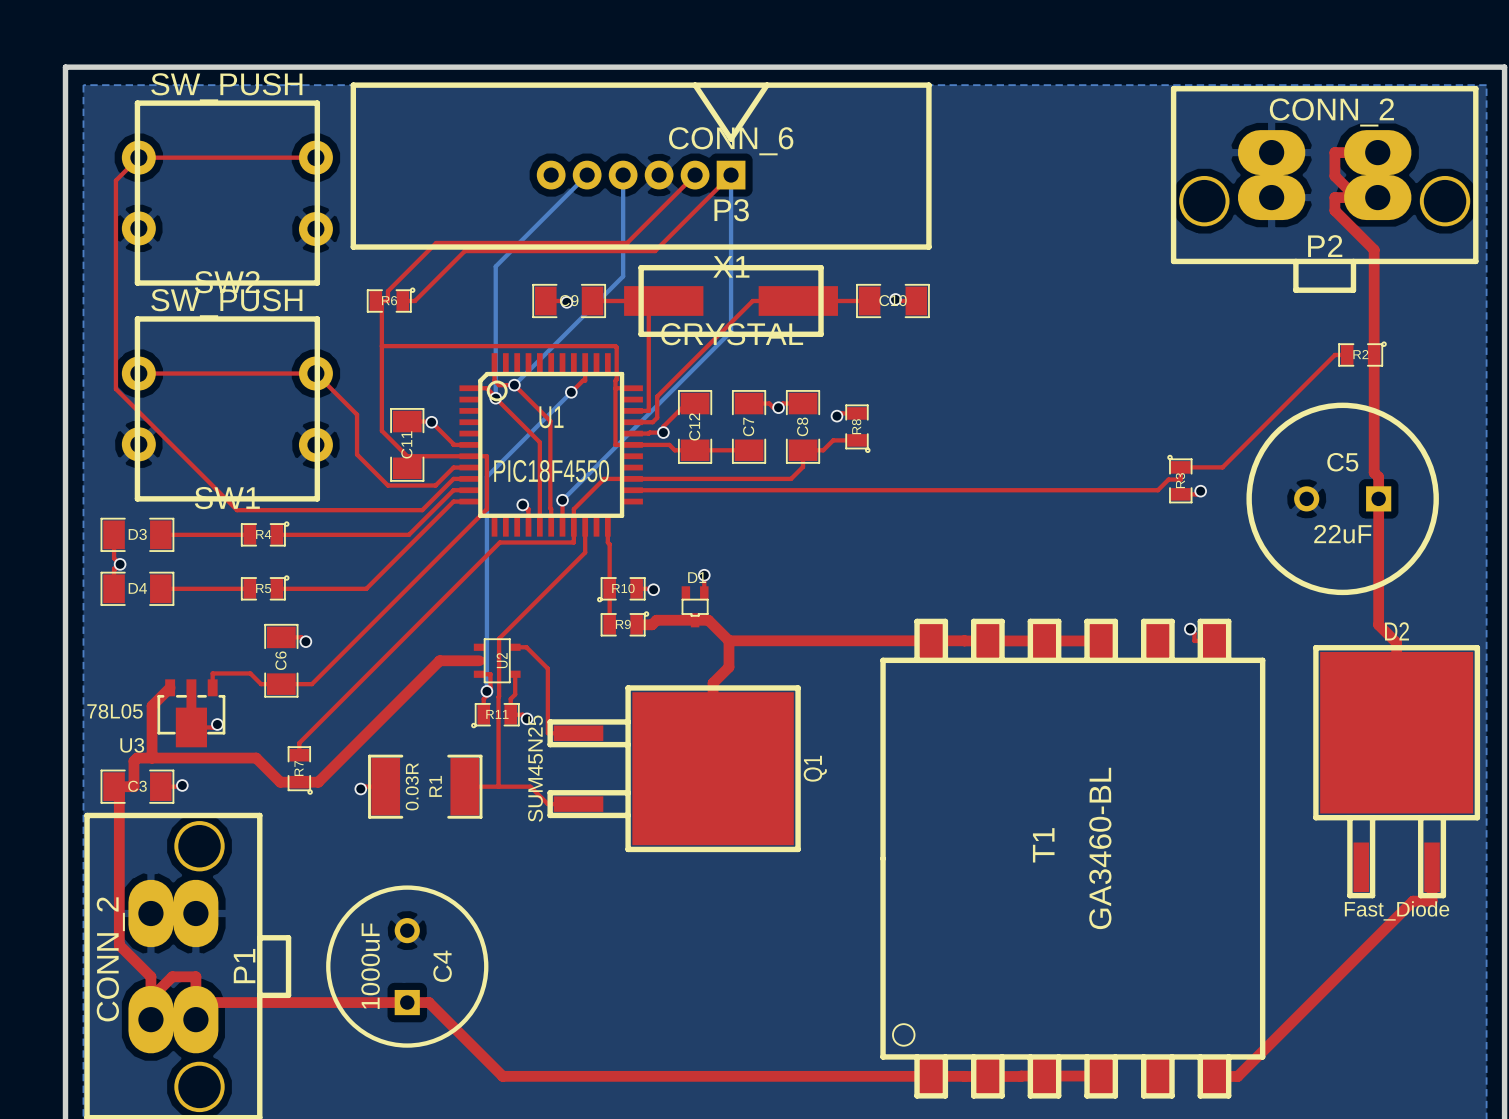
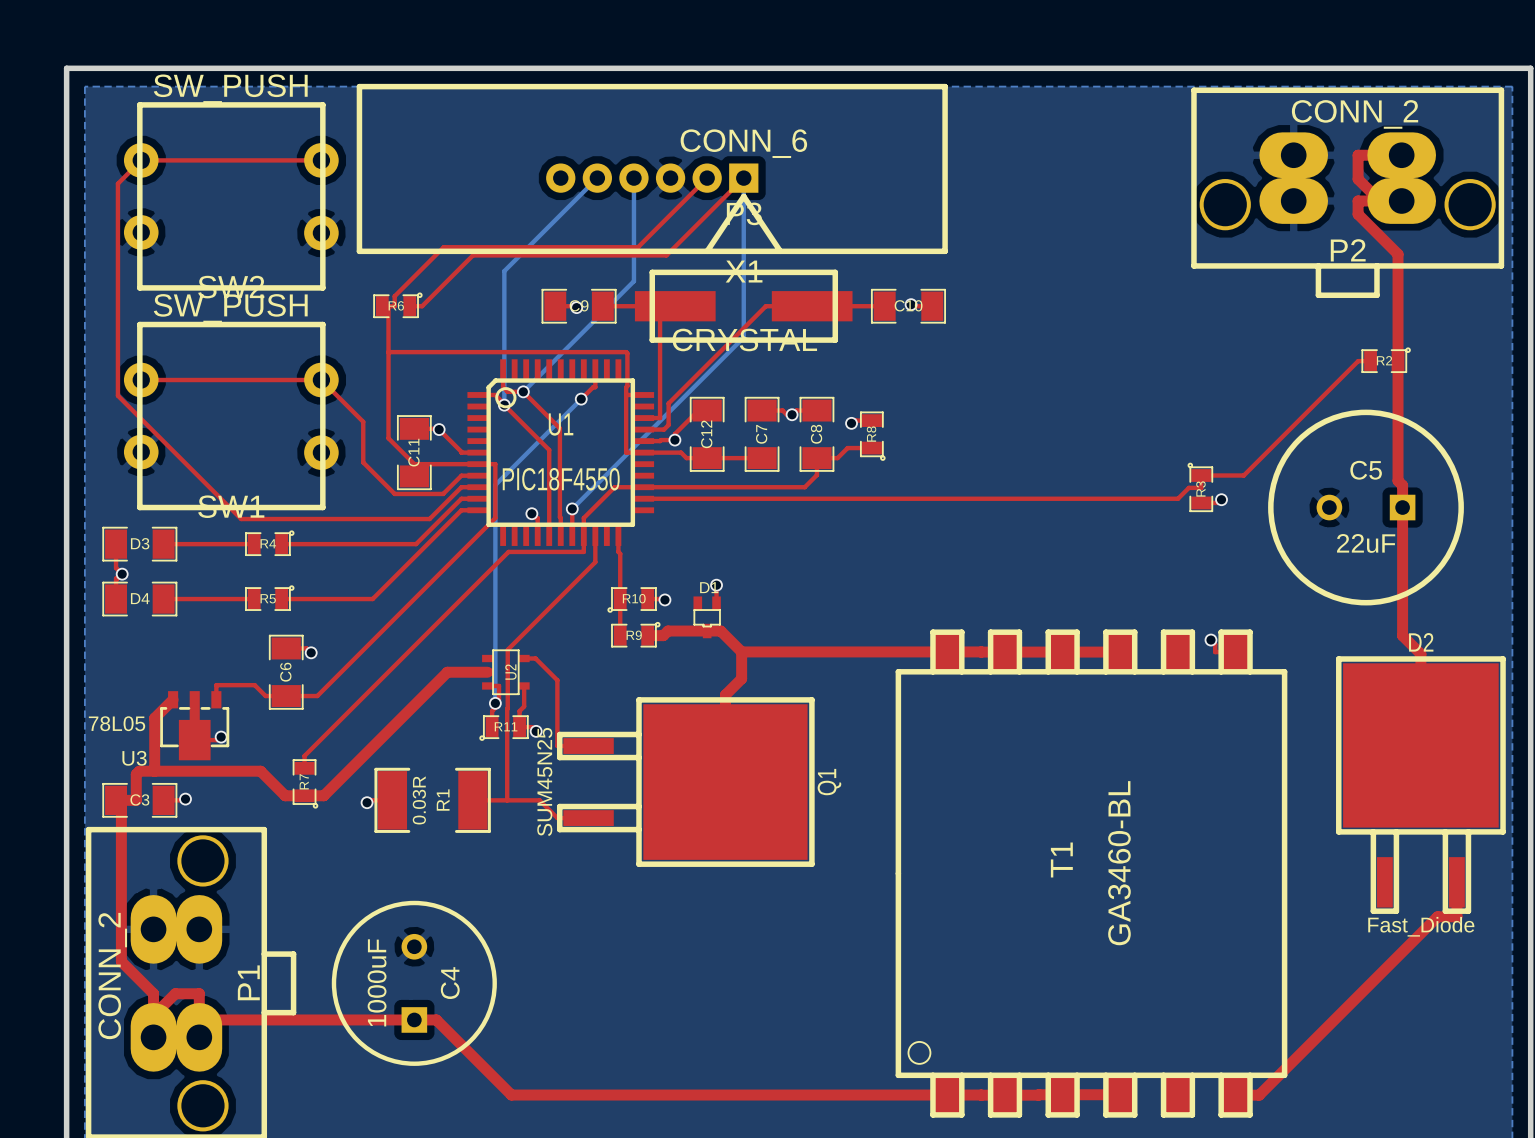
P3 footprint: [350, 82, 932, 250] -> [356, 83, 948, 255]

